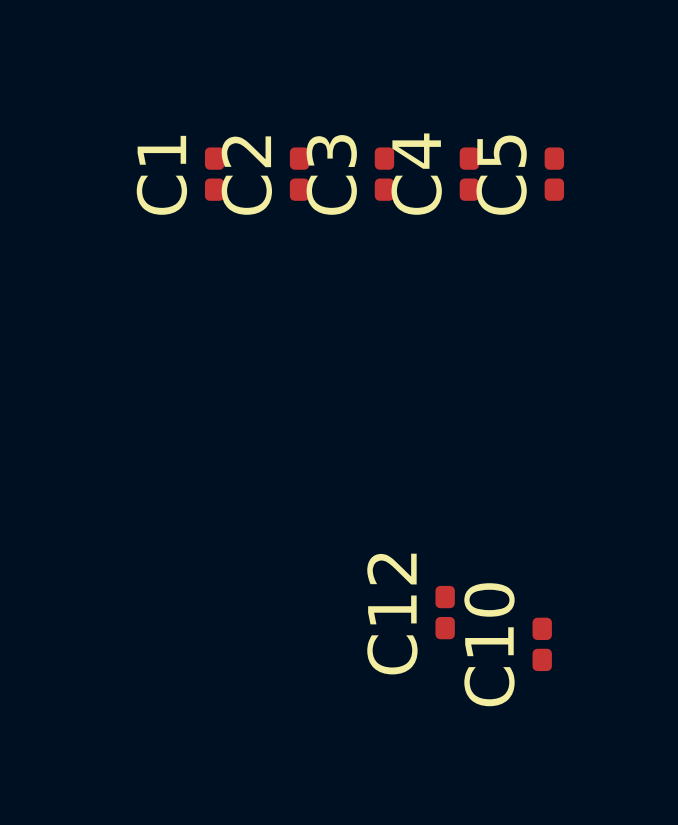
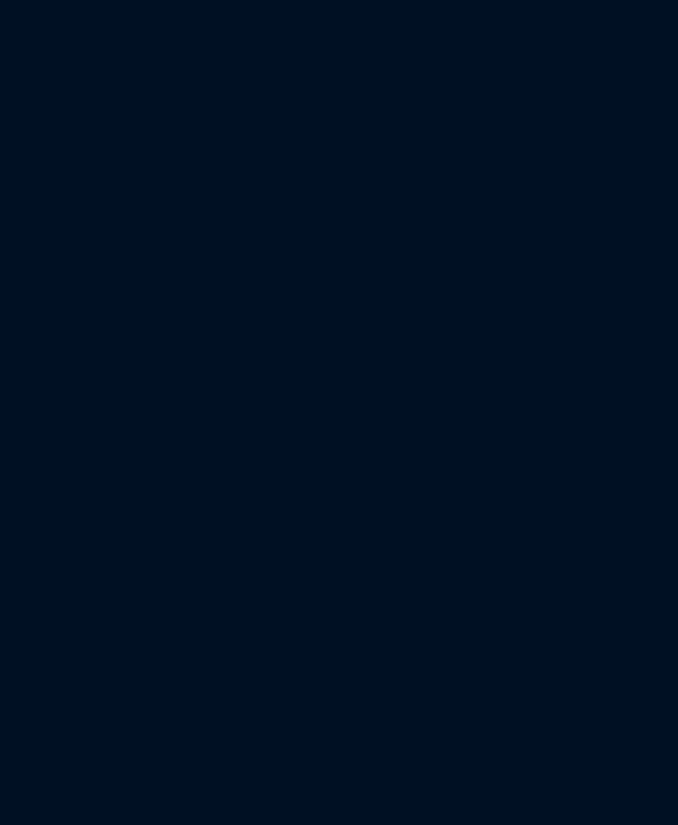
C1: (214, 174) -> none
C2: (299, 174) -> none
C3: (384, 174) -> none
C4: (469, 174) -> none
C5: (554, 174) -> none
C12: (445, 612) -> none
C10: (542, 644) -> none

